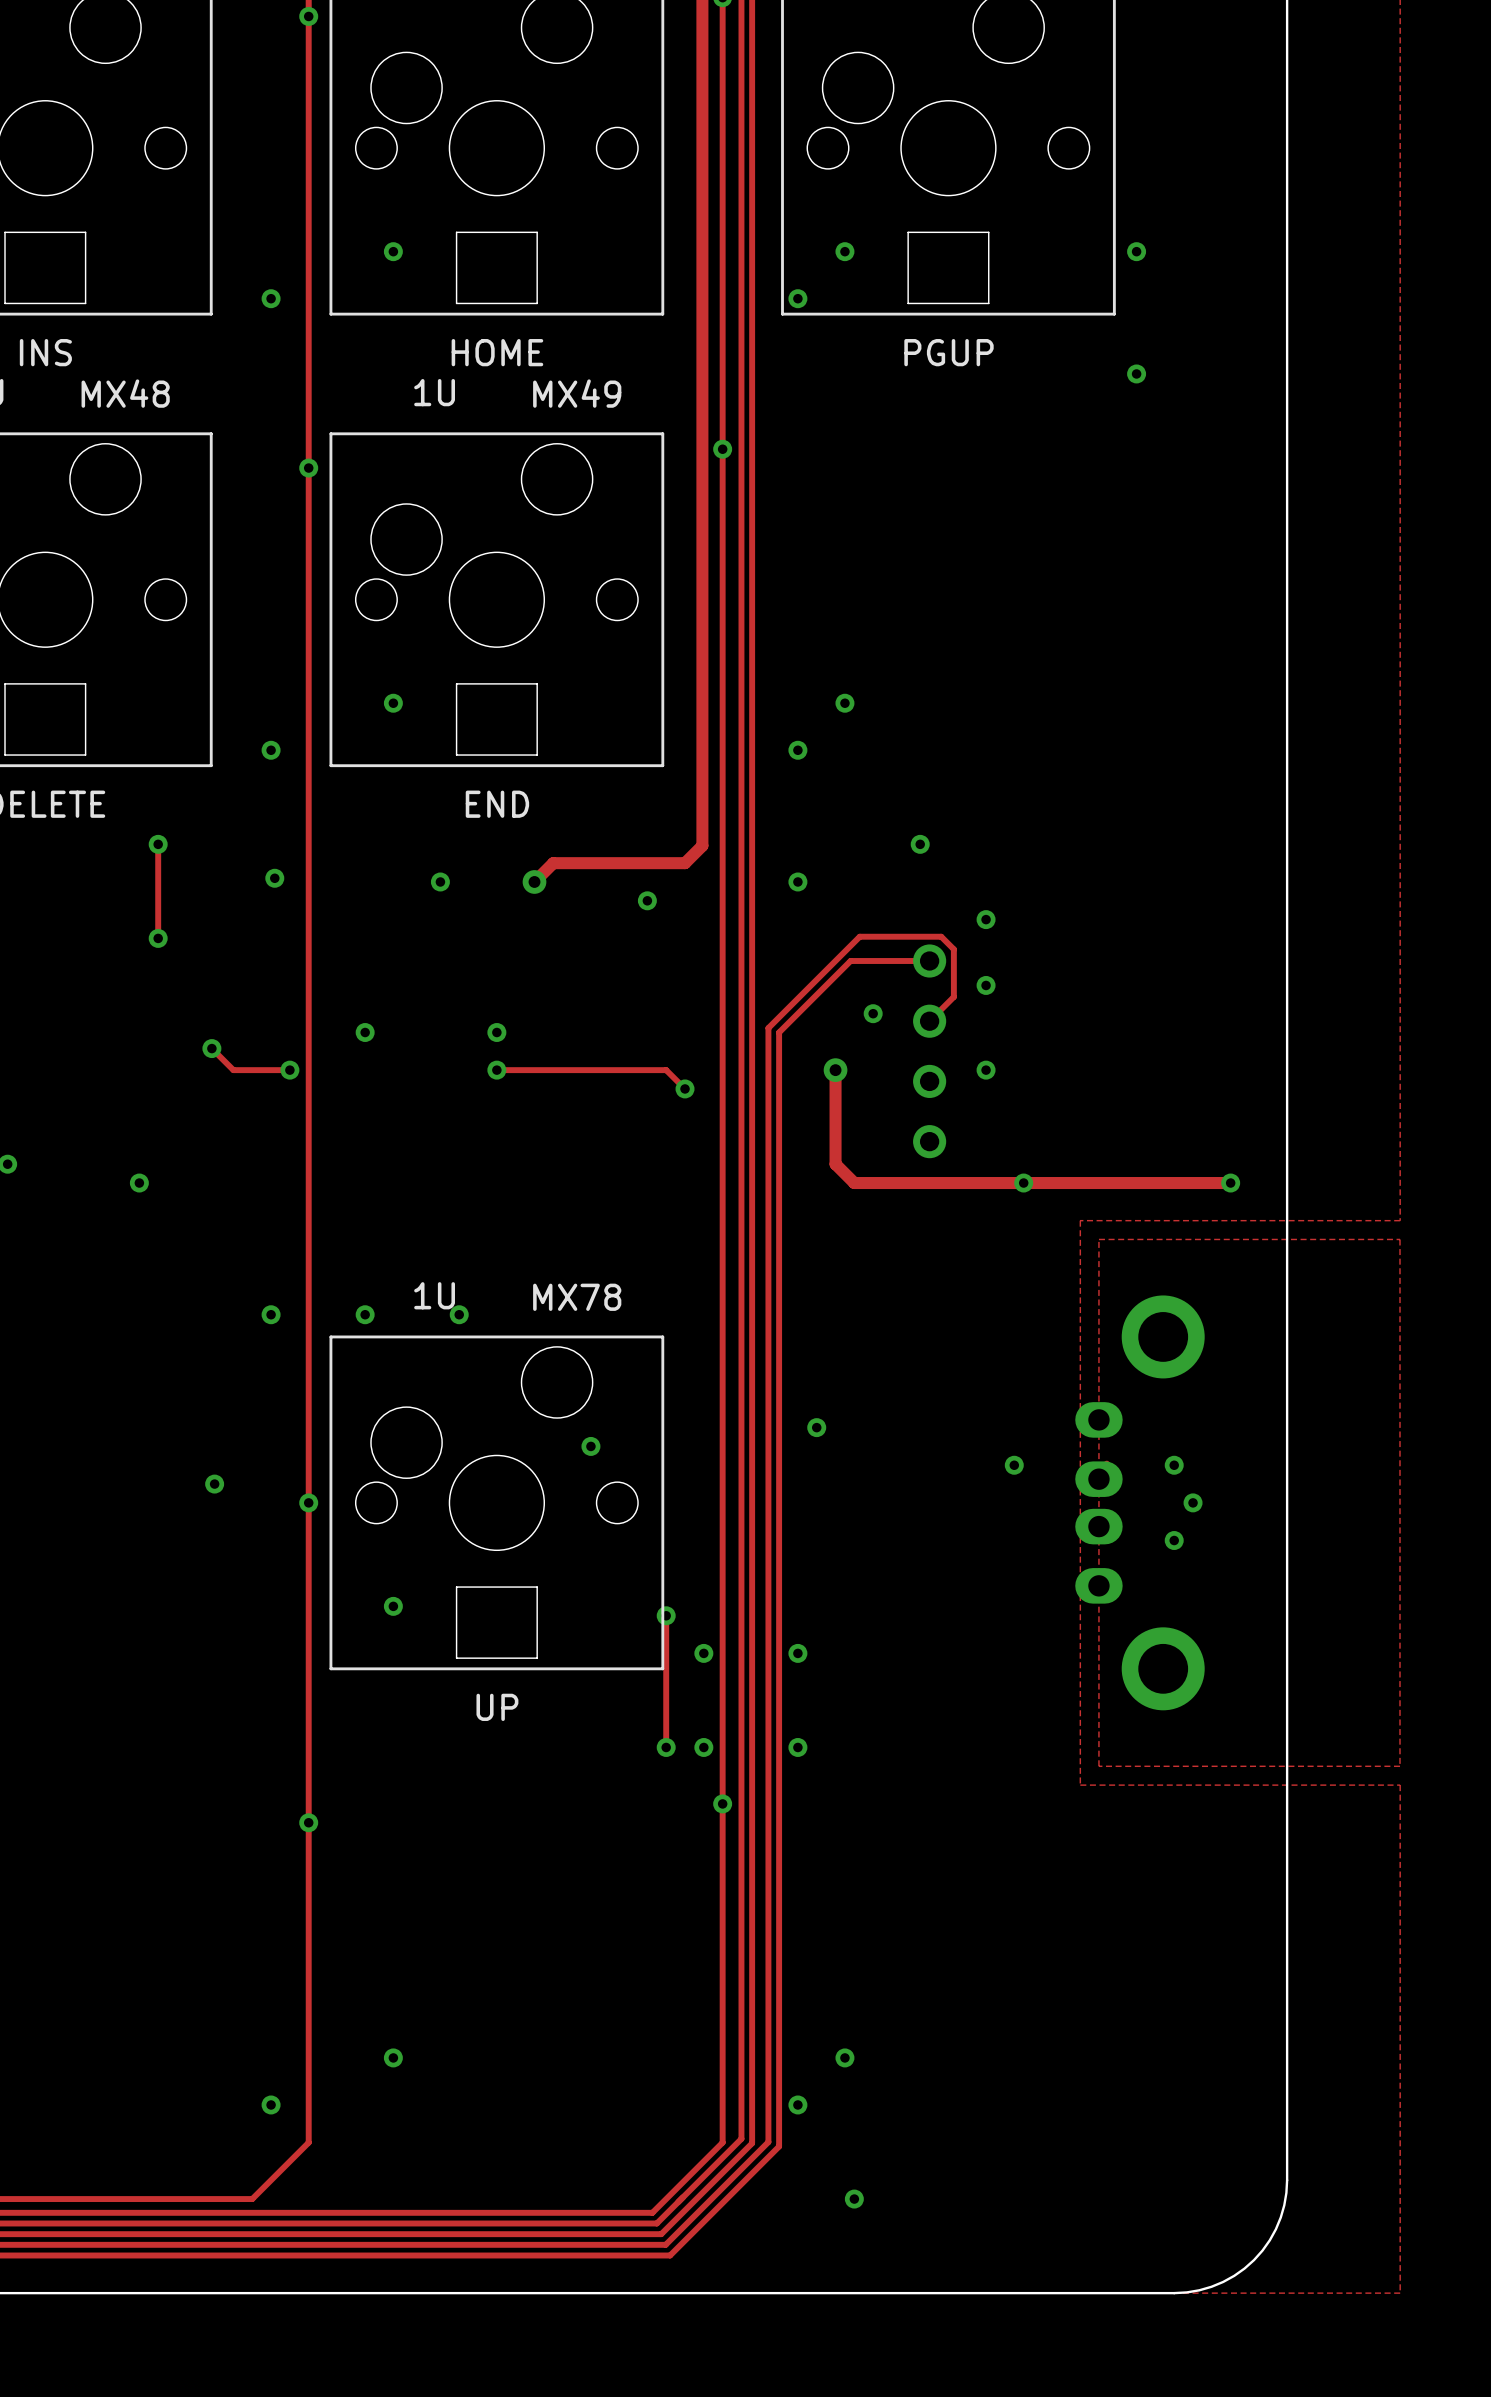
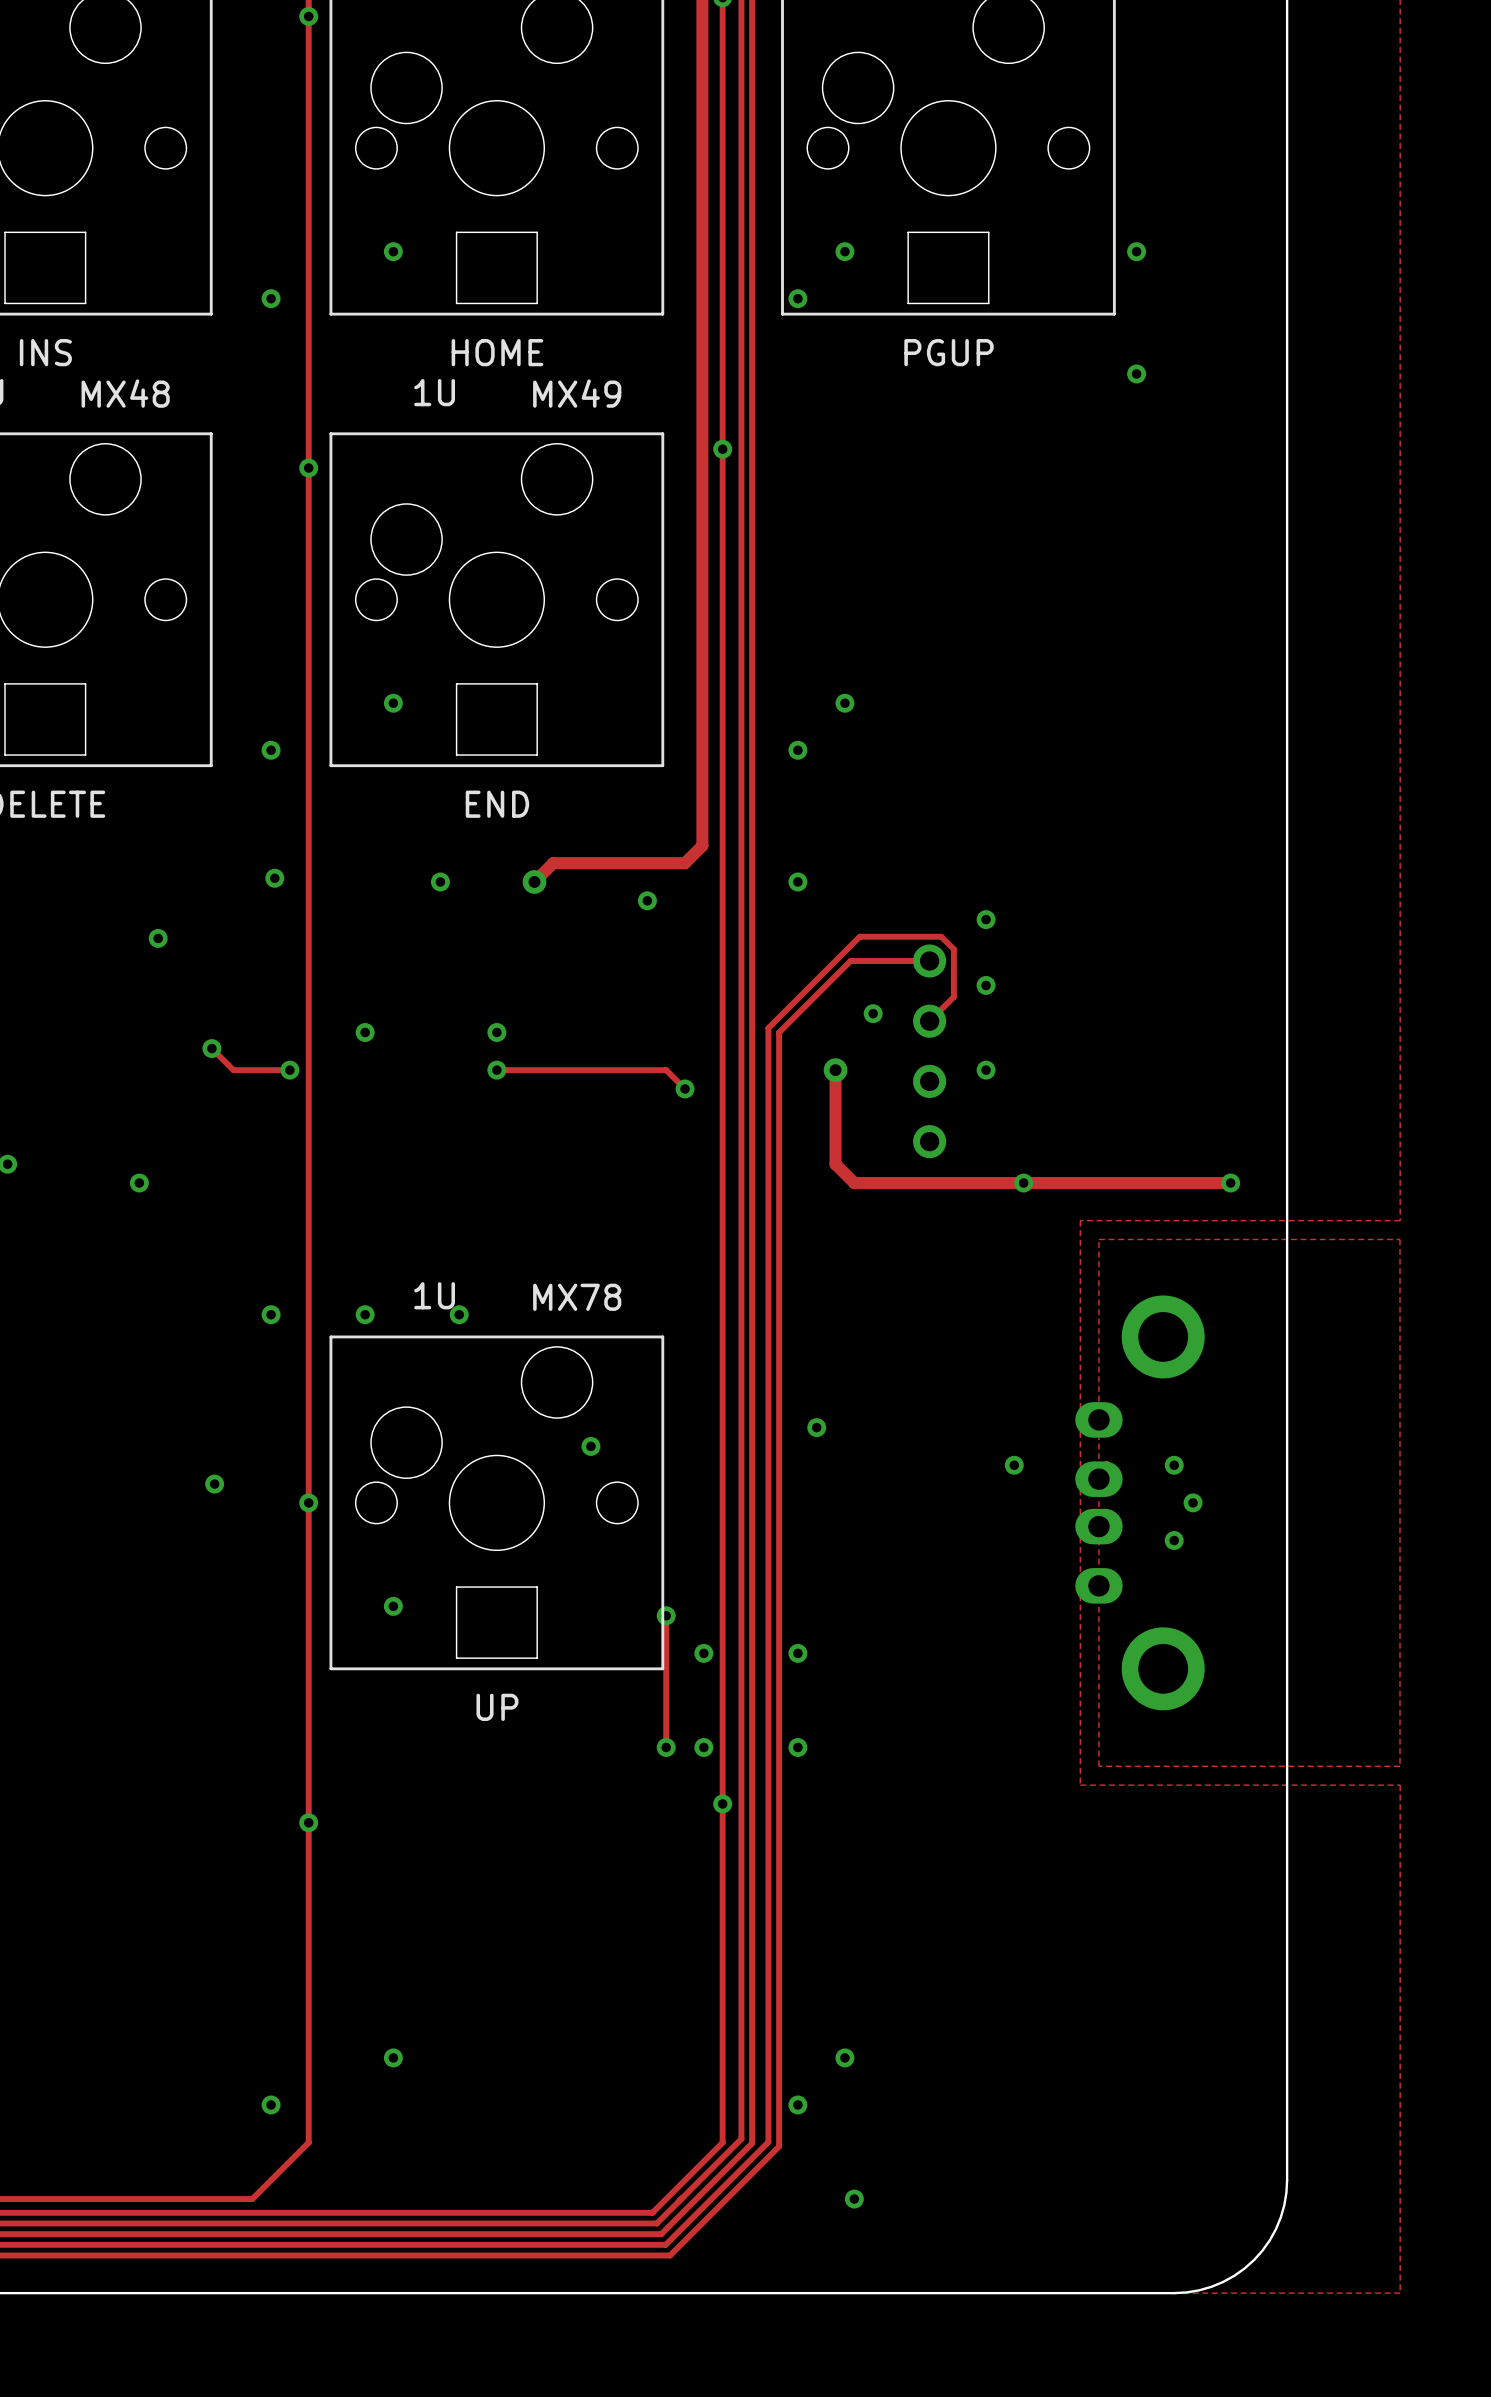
track: (158, 844) (158, 938) -> none
via: (158, 844) -> none
via: (920, 844) -> none

